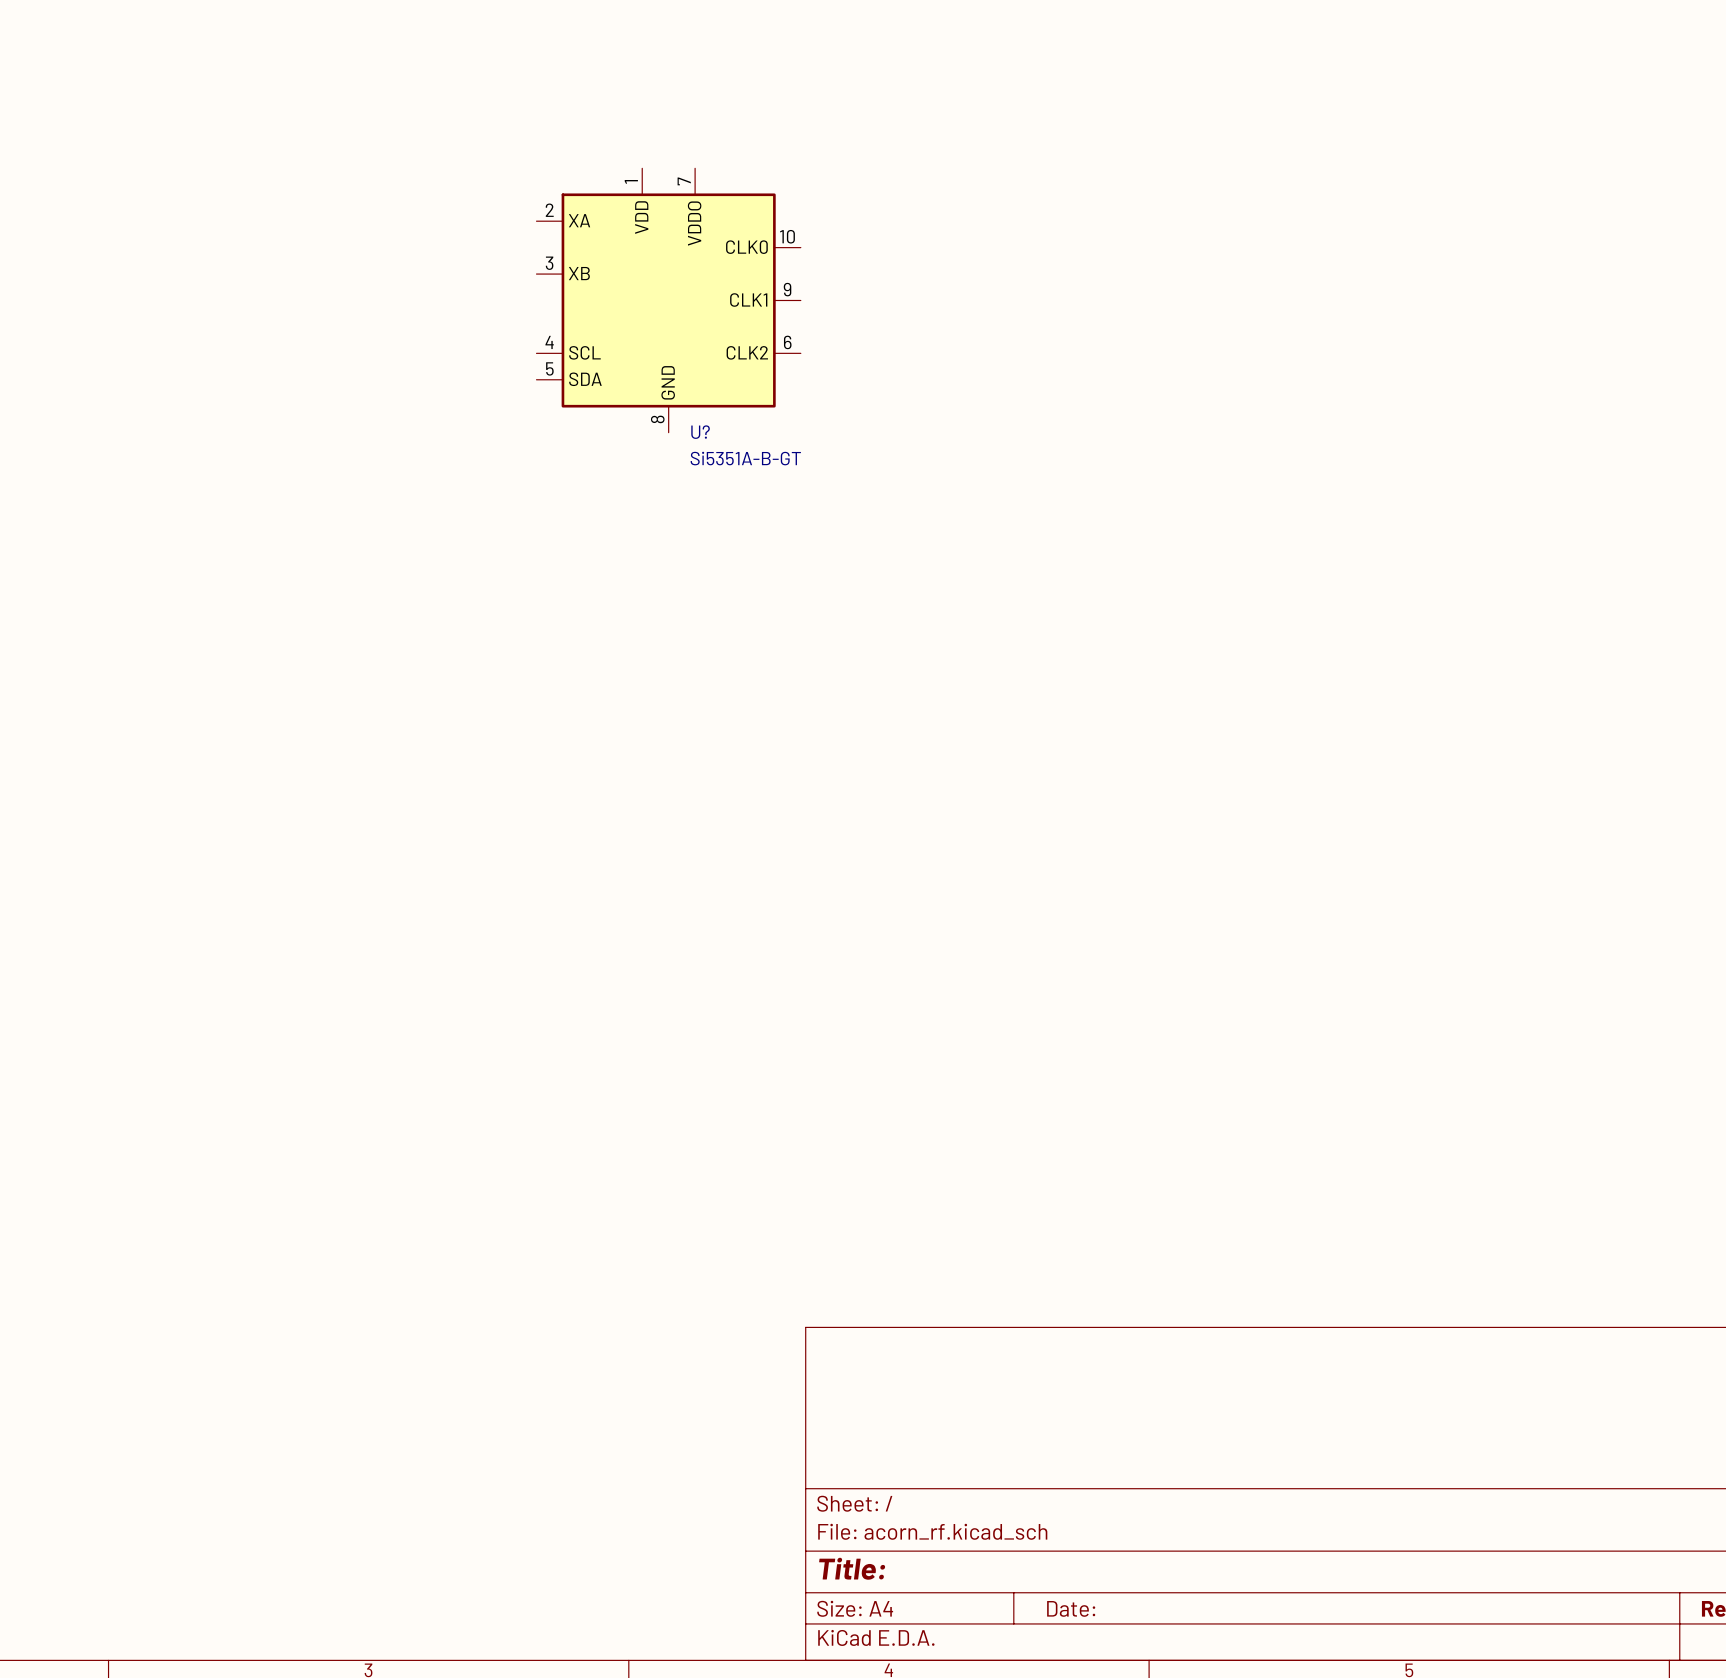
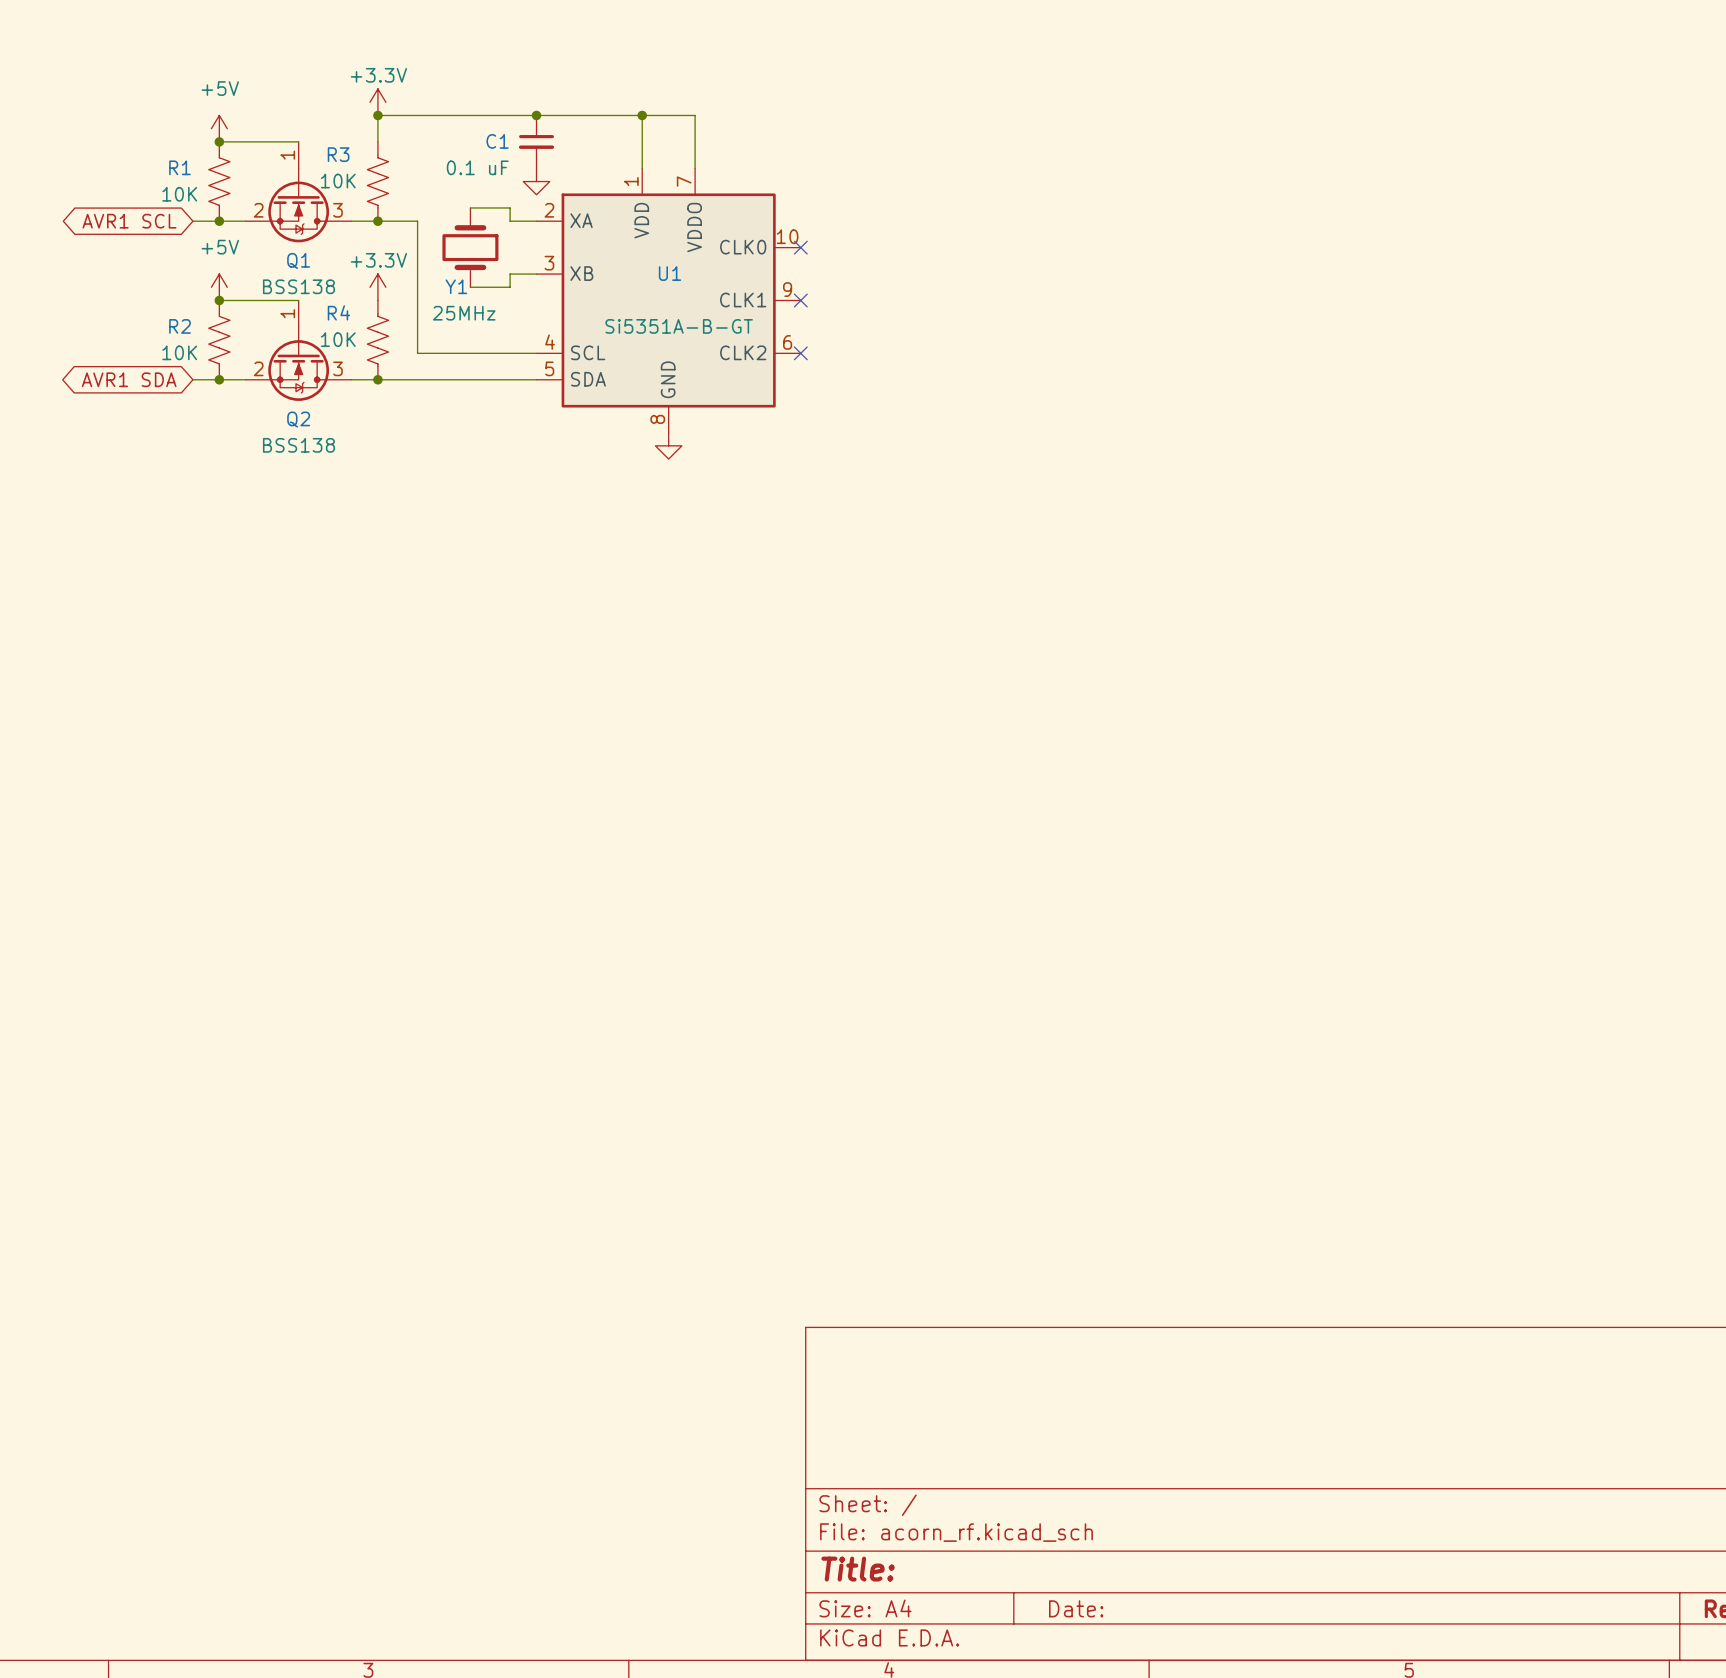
power symbol: none -> +3.3V (377, 102)
junction: none -> (377, 115)
junction: none -> (536, 115)
wire: none -> (642, 115) (642, 168)
junction: none -> (642, 115)
power symbol: none -> +5V (219, 128)
wire: none -> (219, 141) (298, 141)
junction: none -> (219, 141)
wire: none -> (377, 141) (377, 115) (695, 115) (695, 168)
C1: none -> 0.1 uF (536, 141)
R1: none -> 10K (219, 181)
R3: none -> 10K (377, 181)
power symbol: none -> (536, 181)
Q1: none -> BSS138 (298, 192)
wire: none -> (470, 207) (510, 207) (510, 221) (536, 221)
global label: none -> AVR1 SCL (129, 221)
wire: none -> (192, 221) (245, 221)
junction: none -> (219, 221)
wire: none -> (351, 221) (417, 221) (417, 353) (536, 353)
junction: none -> (377, 221)
Y1: none -> 25MHz (470, 247)
no-connect mark: none -> (800, 247)
wire: none -> (536, 274) (510, 274) (510, 287) (470, 287)
power symbol: none -> +5V (219, 287)
power symbol: none -> +3.3V (377, 287)
wire: none -> (219, 300) (298, 300)
junction: none -> (219, 300)
no-connect mark: none -> (800, 300)
R2: none -> 10K (219, 340)
R4: none -> 10K (377, 340)
Q2: none -> BSS138 (298, 350)
no-connect mark: none -> (800, 353)
global label: none -> AVR1 SDA (129, 379)
wire: none -> (192, 379) (245, 379)
junction: none -> (219, 379)
wire: none -> (351, 379) (536, 379)
junction: none -> (377, 379)
U? name: U? (700, 432) -> U1 (670, 273)
power symbol: none -> (668, 445)
U? value position: Si5351A-B-GT (745, 458) -> Si5351A-B-GT (679, 326)

